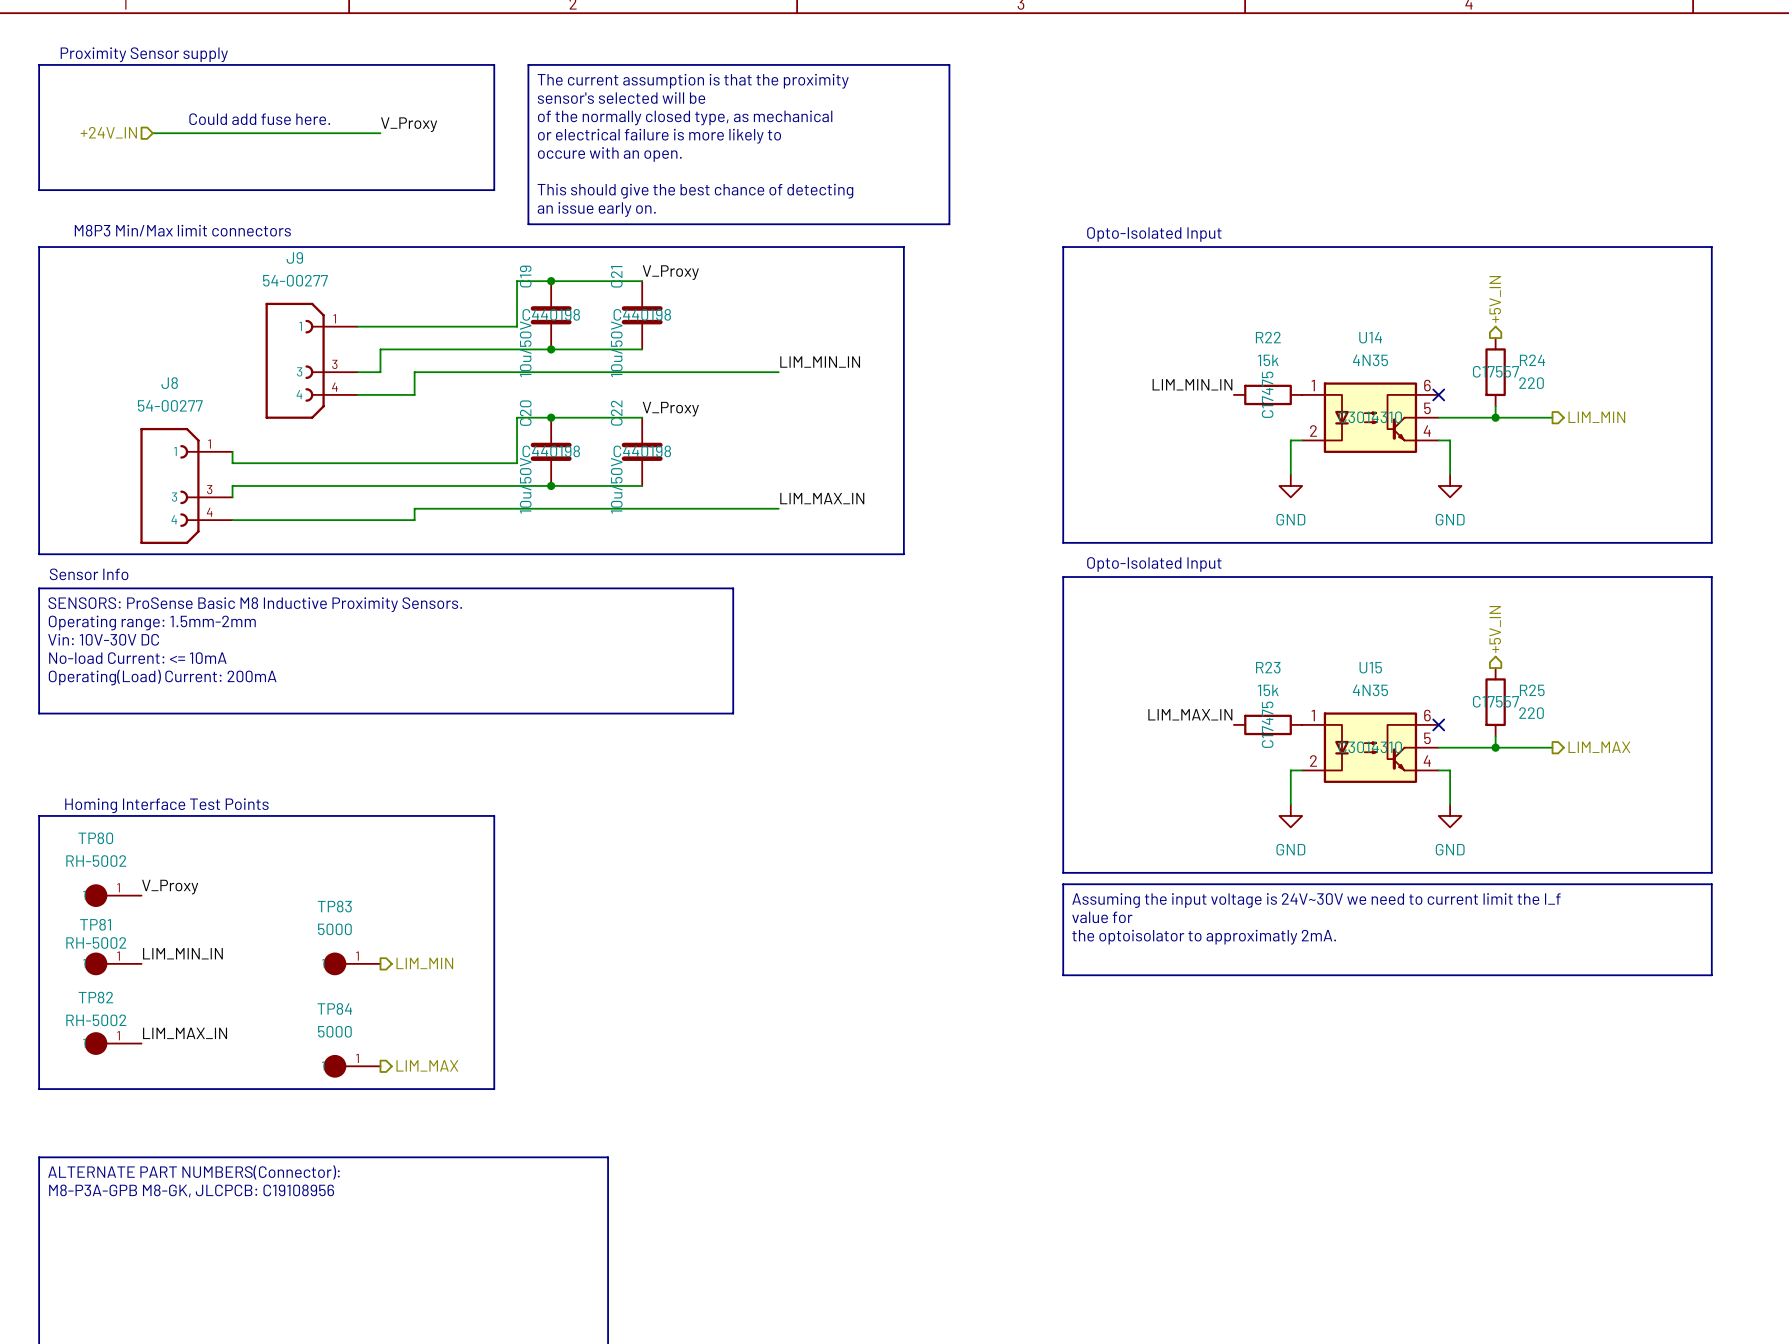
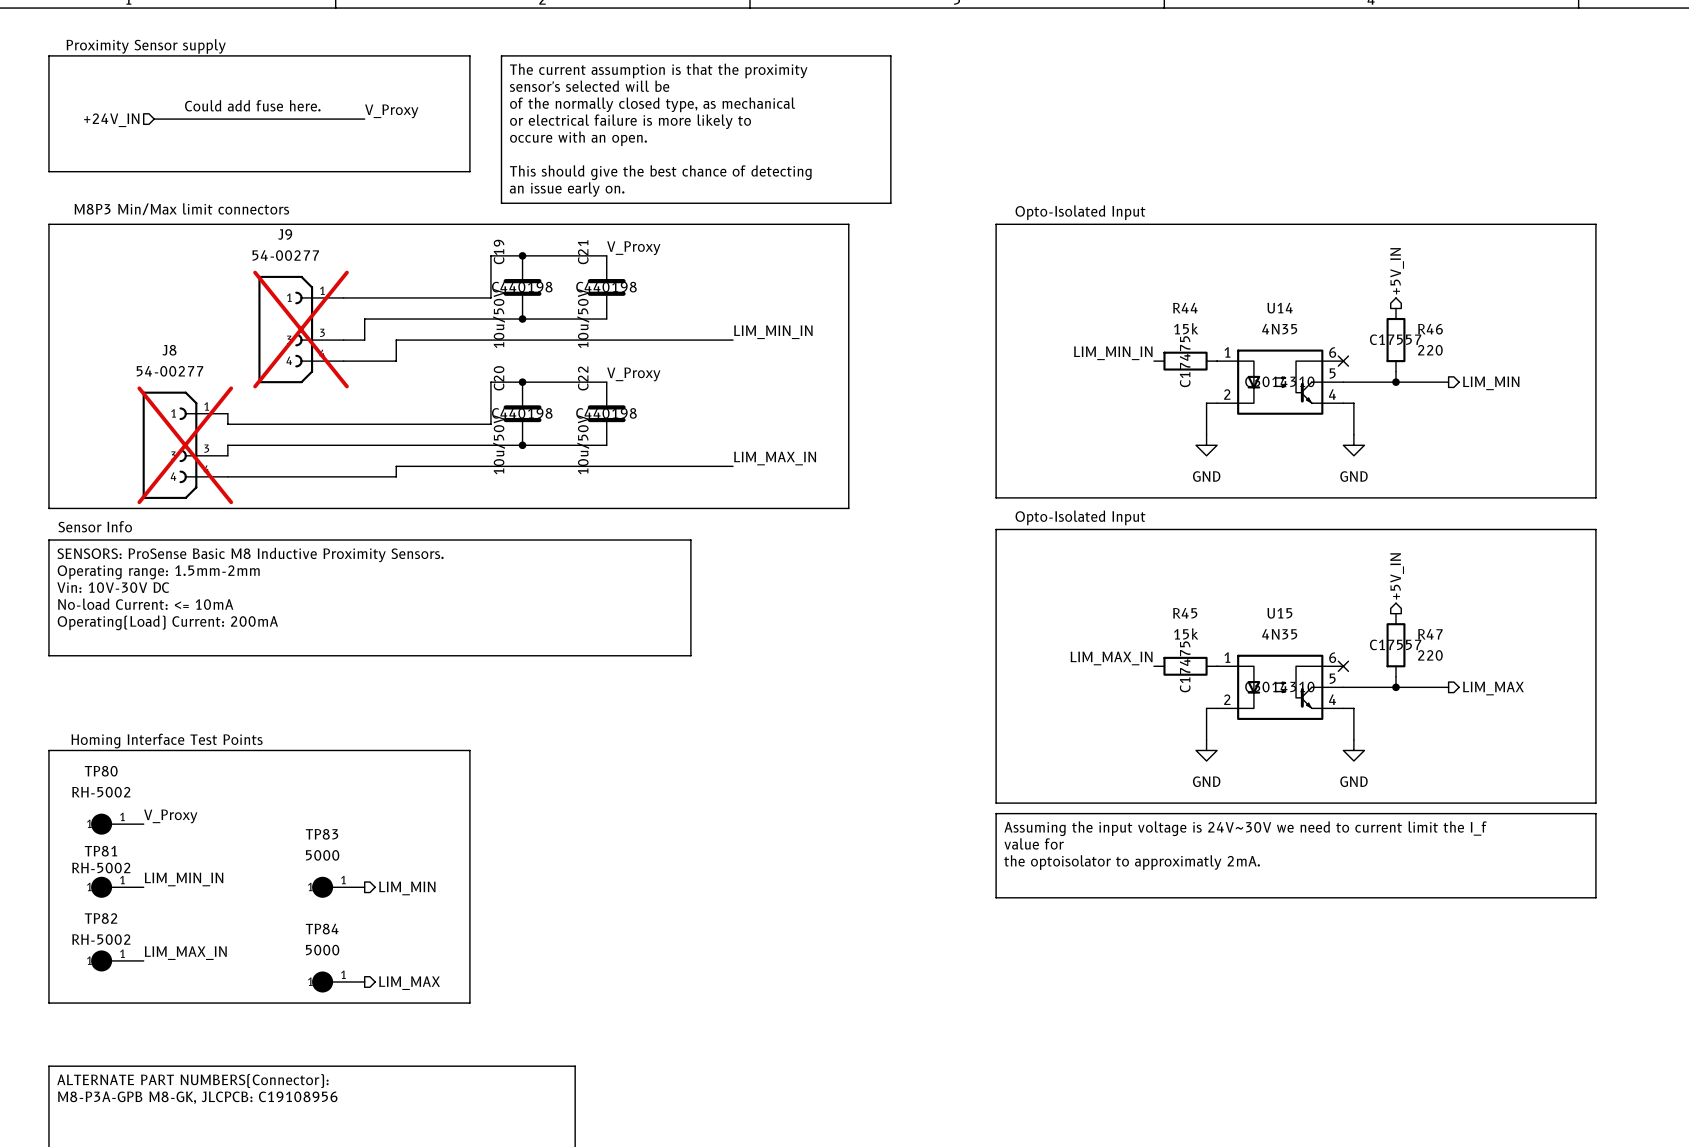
R22 name: R22 (1268, 337) -> R44 (1185, 308)
J9 do-not-place cross: none -> (301, 329)
R24 name: R24 (1532, 360) -> R46 (1430, 329)
J8 do-not-place cross: none -> (185, 445)
R23 name: R23 (1268, 667) -> R45 (1185, 613)
R25 name: R25 (1532, 690) -> R47 (1430, 634)

